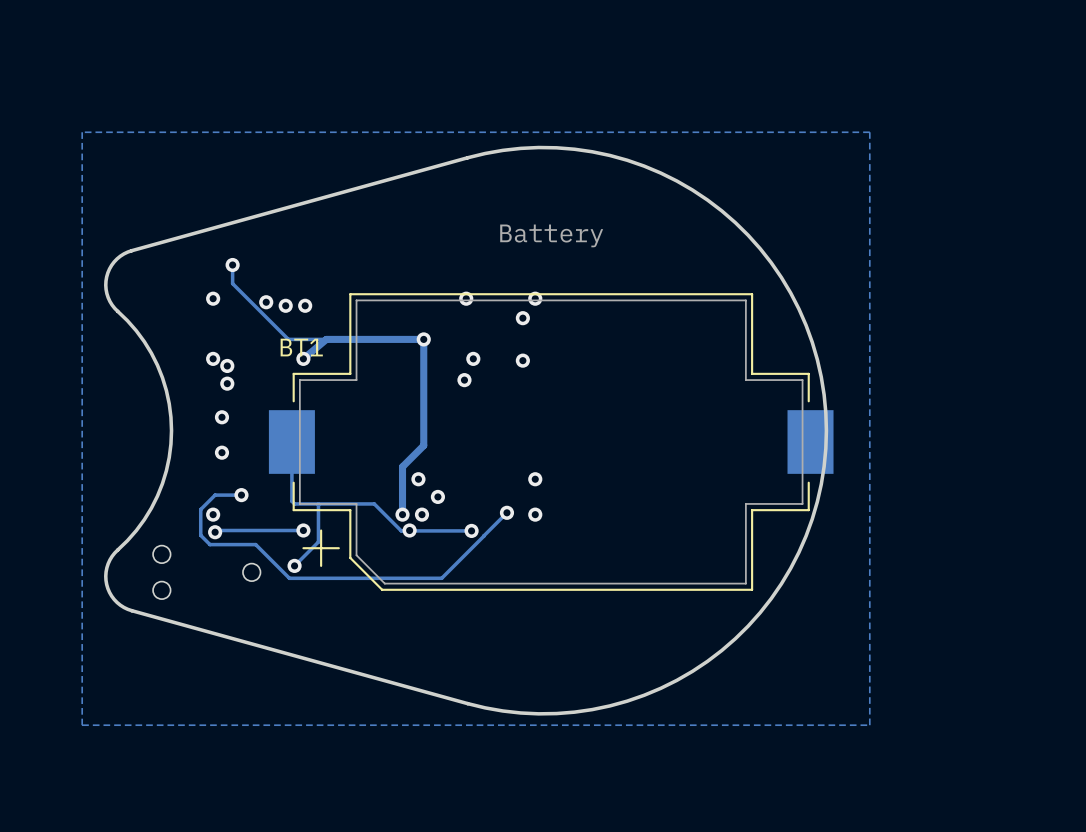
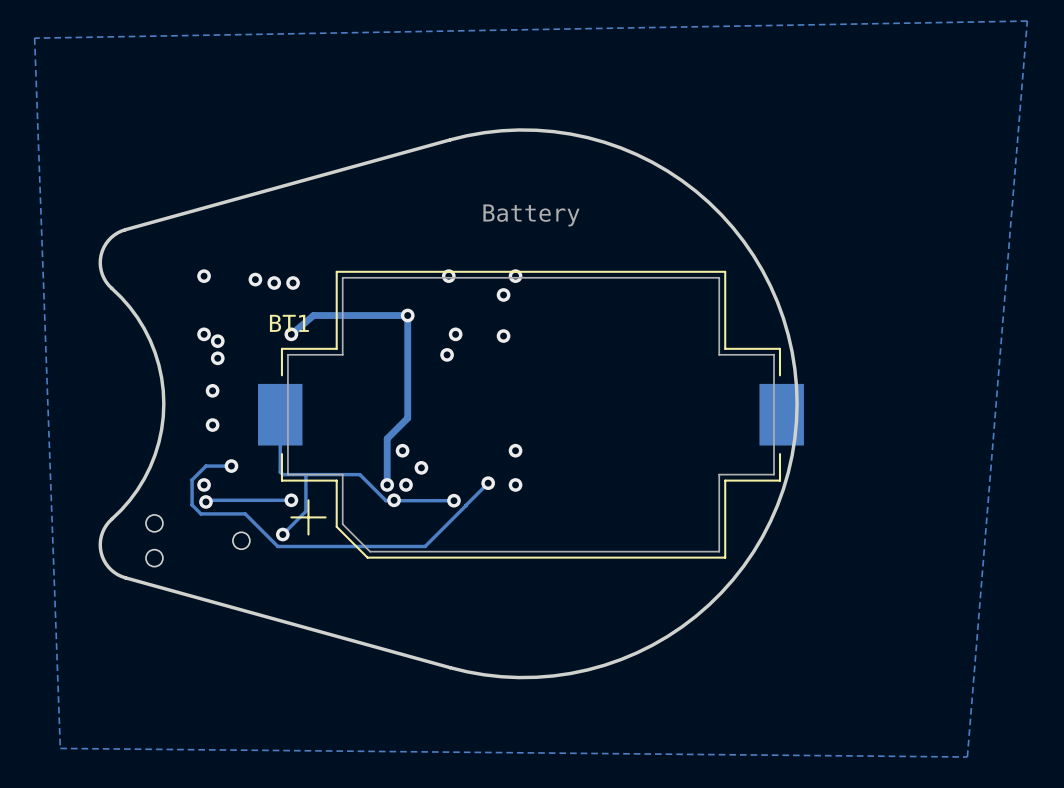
zone outline: (869, 132) (869, 725) (82, 725) (82, 132) (869, 132) -> (1027, 21) (967, 757) (60, 748) (34, 38) (1027, 21)
track: (232, 265) (232, 283) (288, 339) (326, 339) -> none
via: (232, 265) -> none

